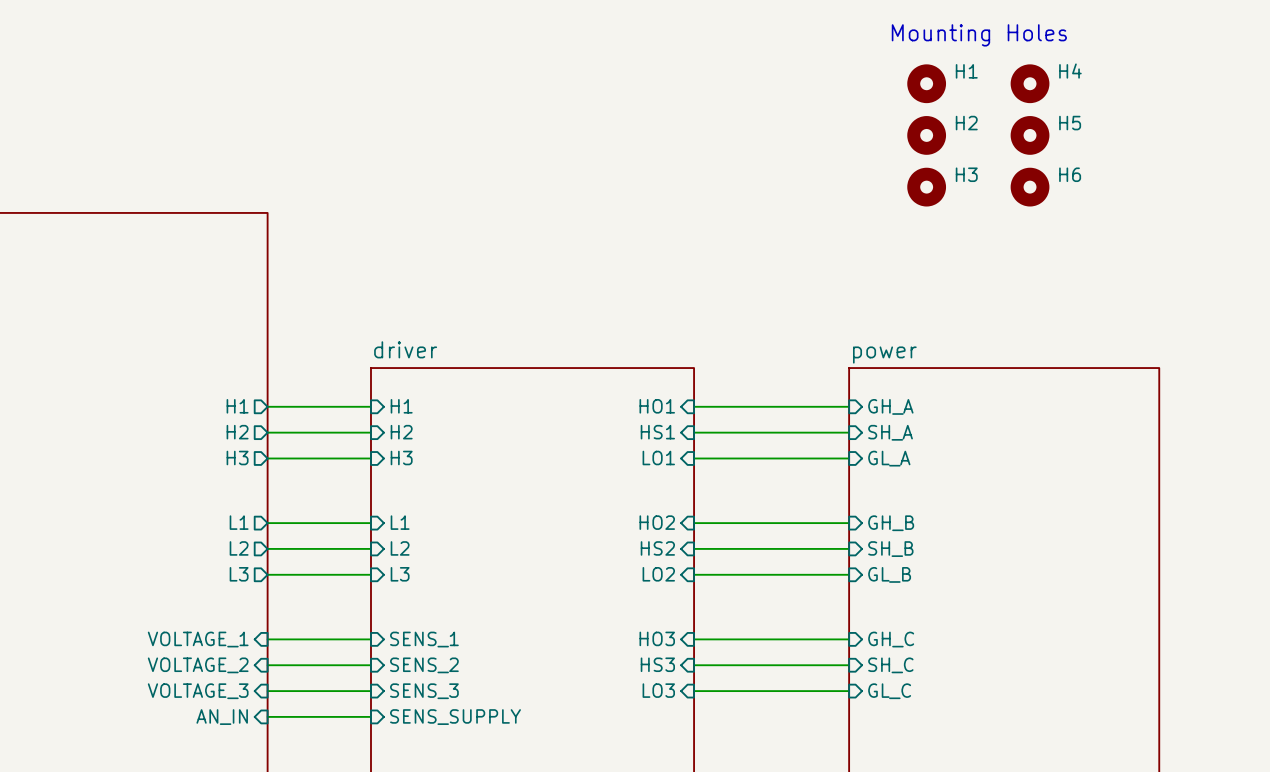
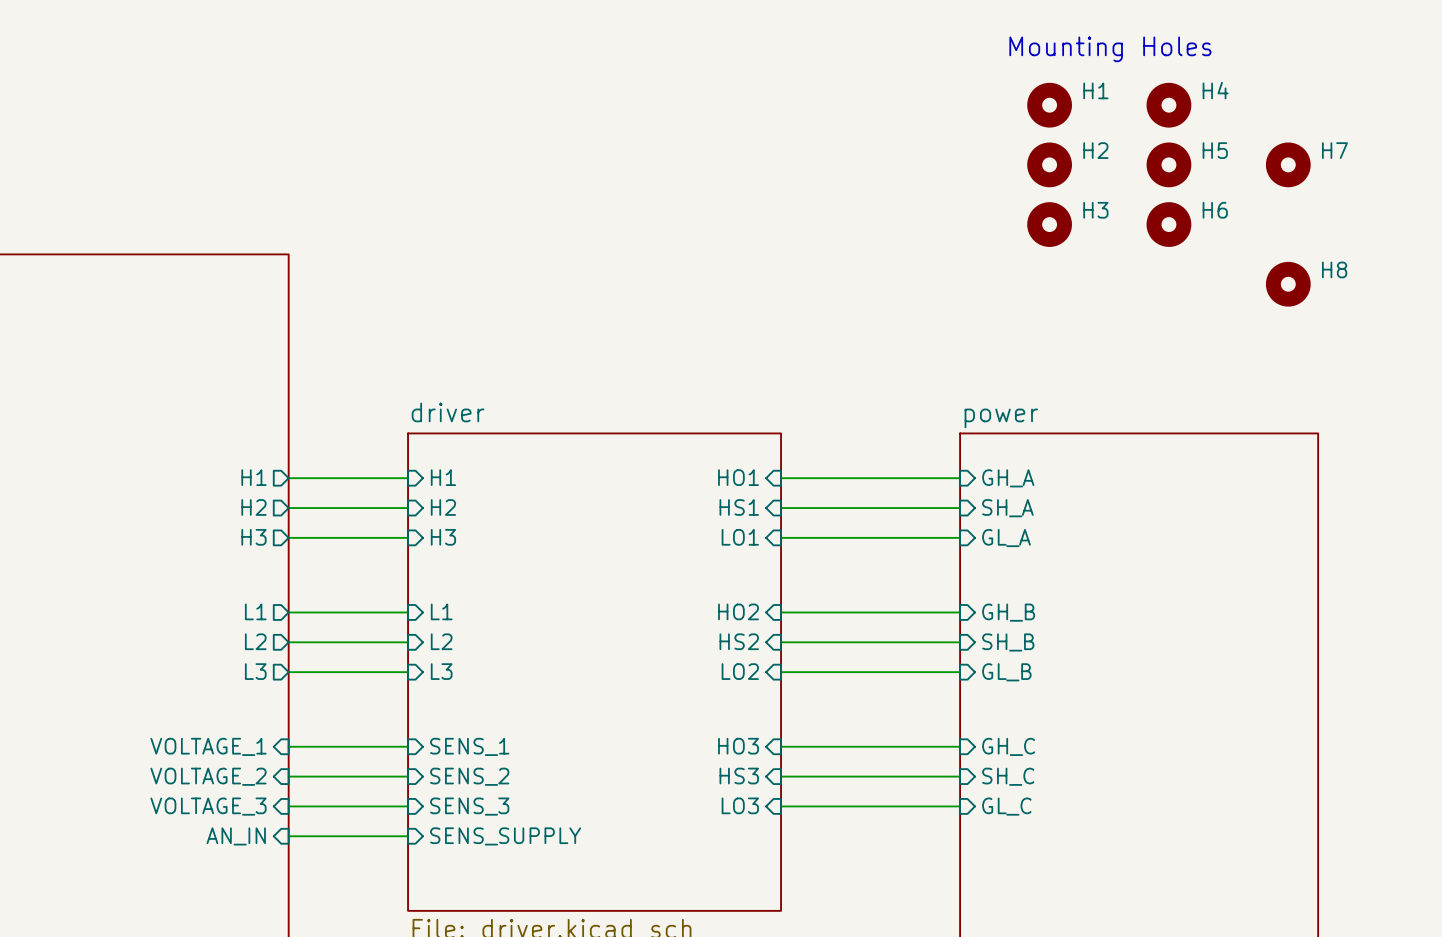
H7: none -> (1288, 164)
H8: none -> (1288, 284)

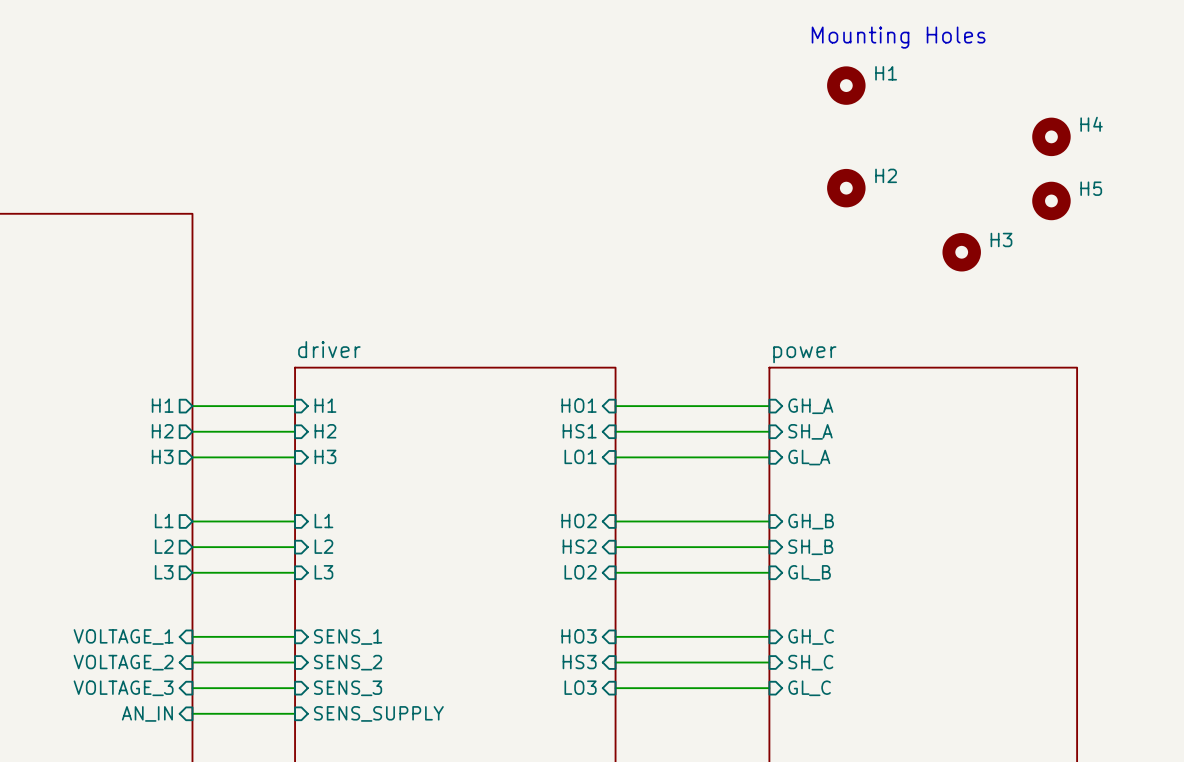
H4: (1168, 105) -> none
H7 name: H7 (1334, 150) -> H4 (1091, 124)
H2: (1049, 164) -> none
H5 position: (1168, 164) -> (1051, 200)
H3 name: H3 (1095, 210) -> H2 (886, 175)
H6: (1168, 224) -> none
H8: (1288, 284) -> none
H3: none -> (961, 252)

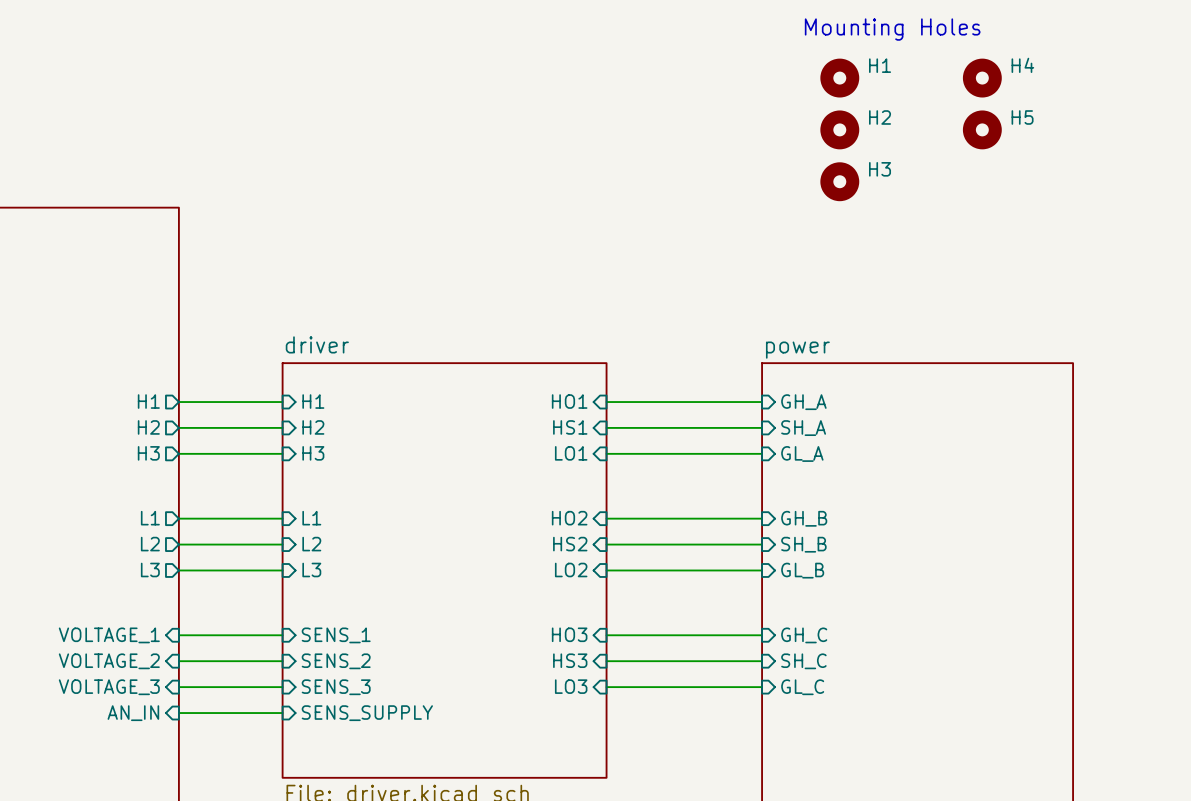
H2: none -> (839, 129)
H4 position: (1051, 136) -> (982, 78)
H2 name: H2 (886, 175) -> H3 (880, 169)
H5 position: (1051, 200) -> (982, 129)
H3: (961, 252) -> none

